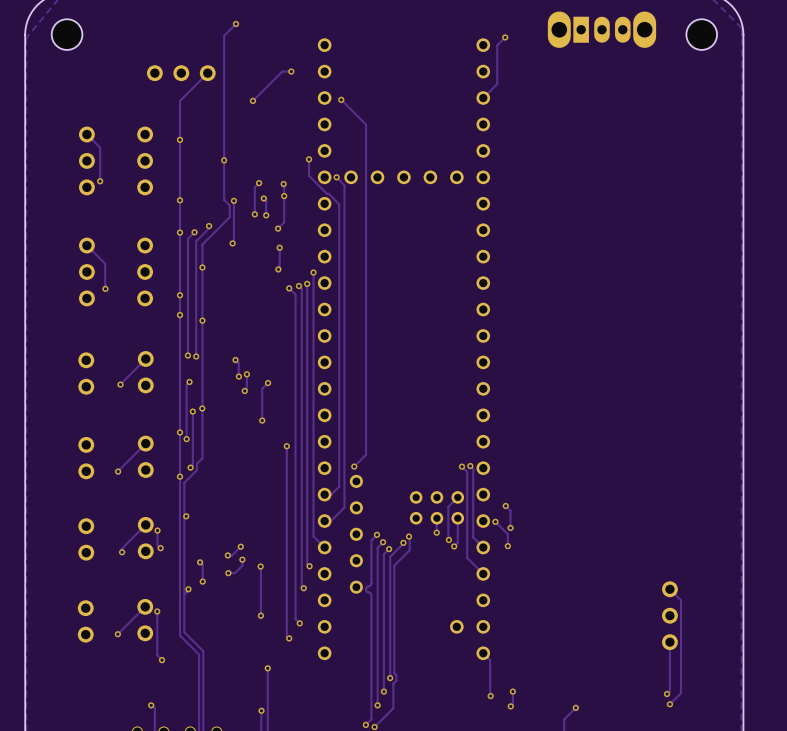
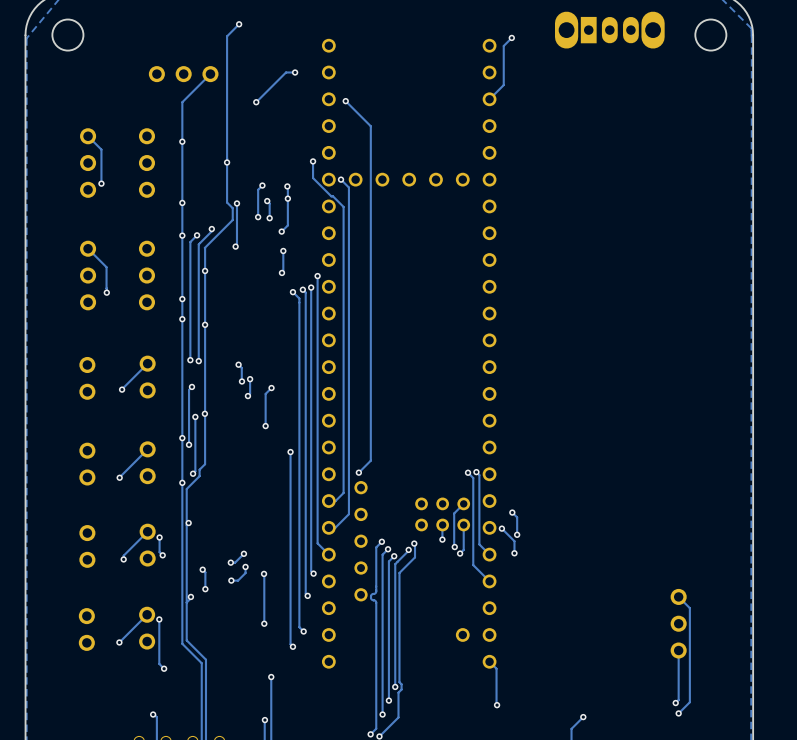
track: (512, 691) (512, 704) (510, 706) -> none
via: (512, 691) -> none
via: (510, 706) -> none

